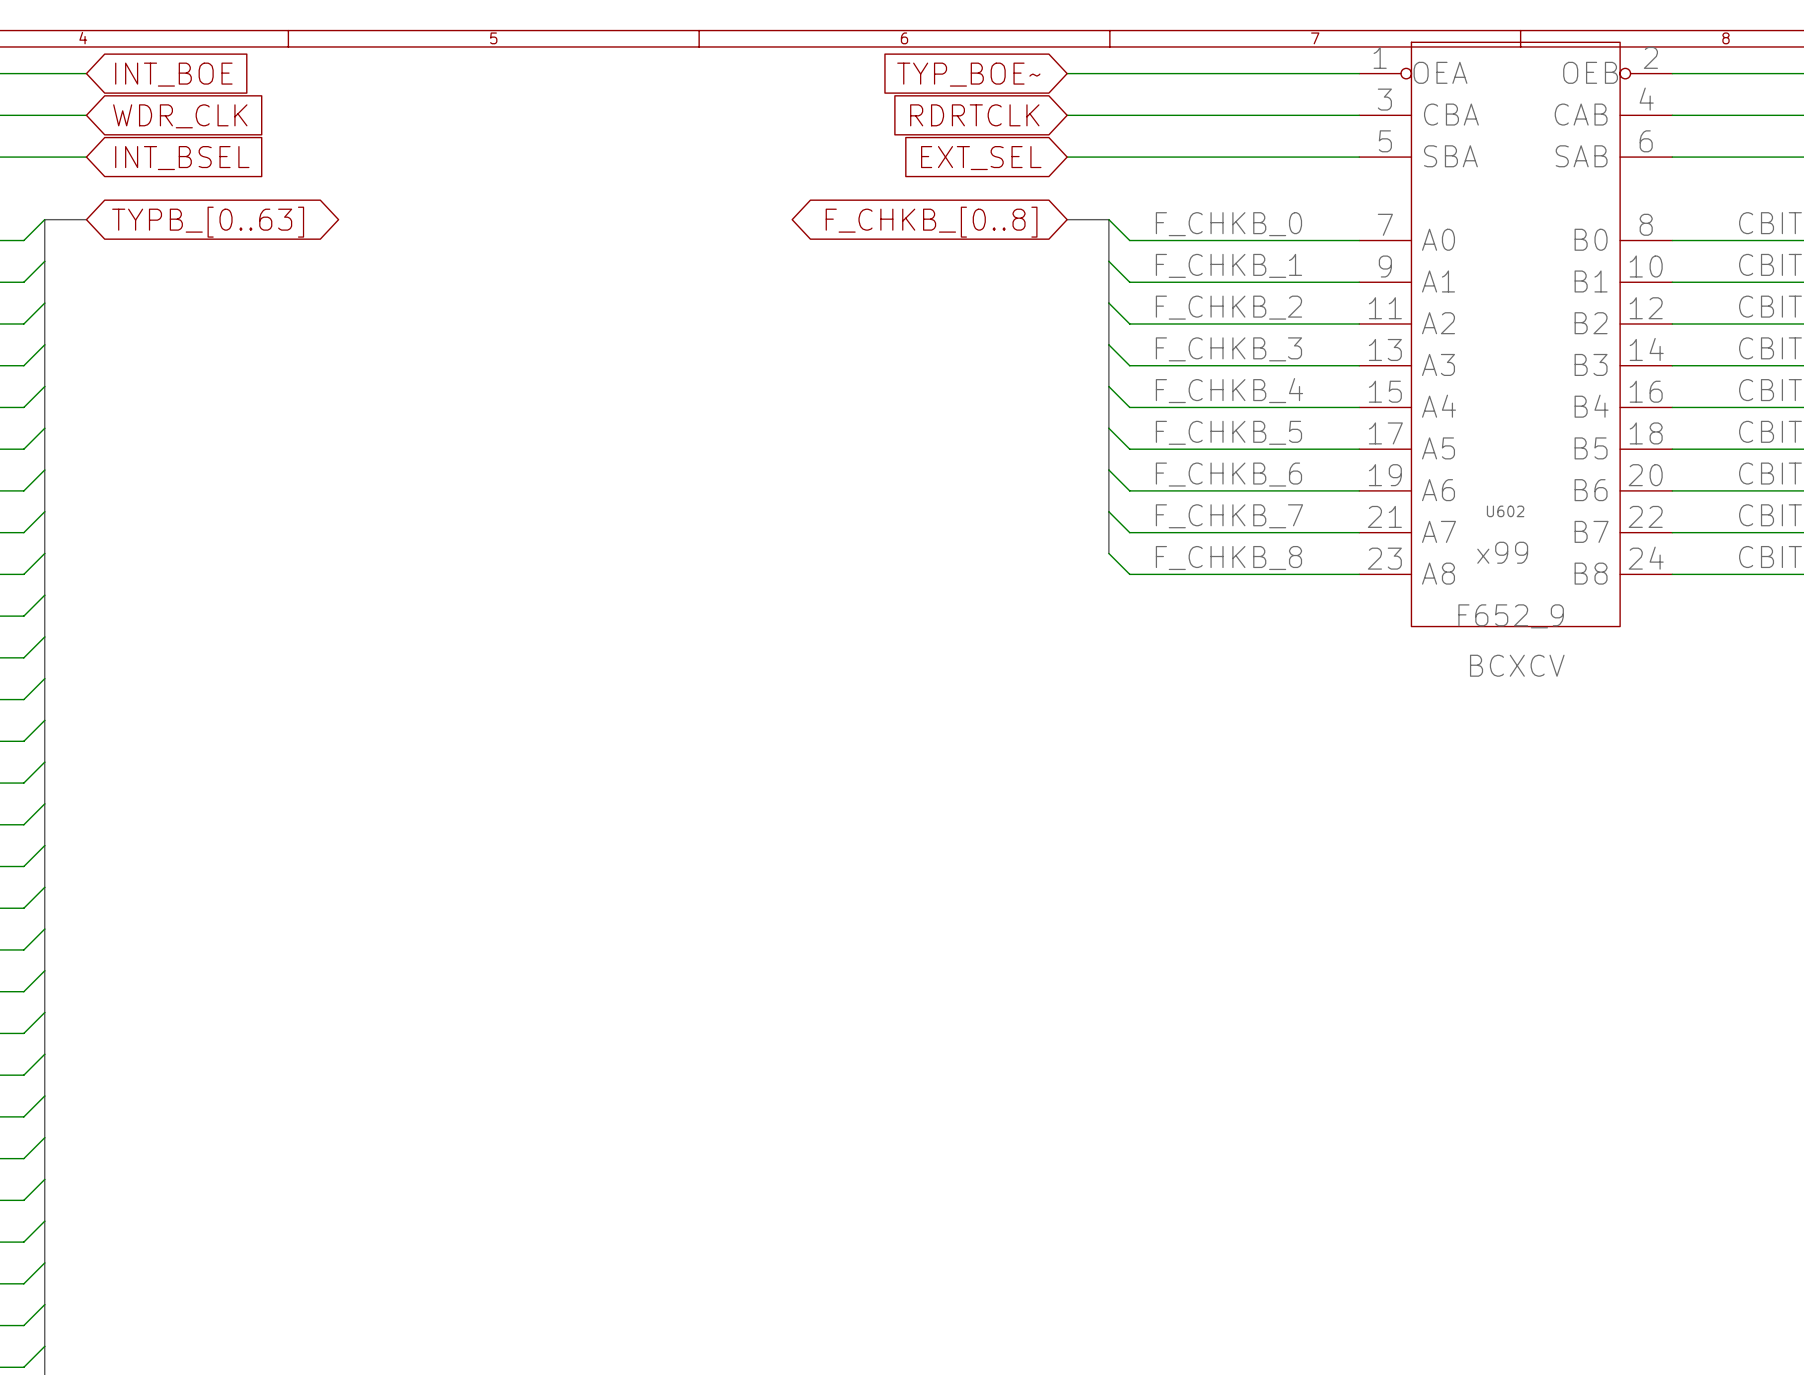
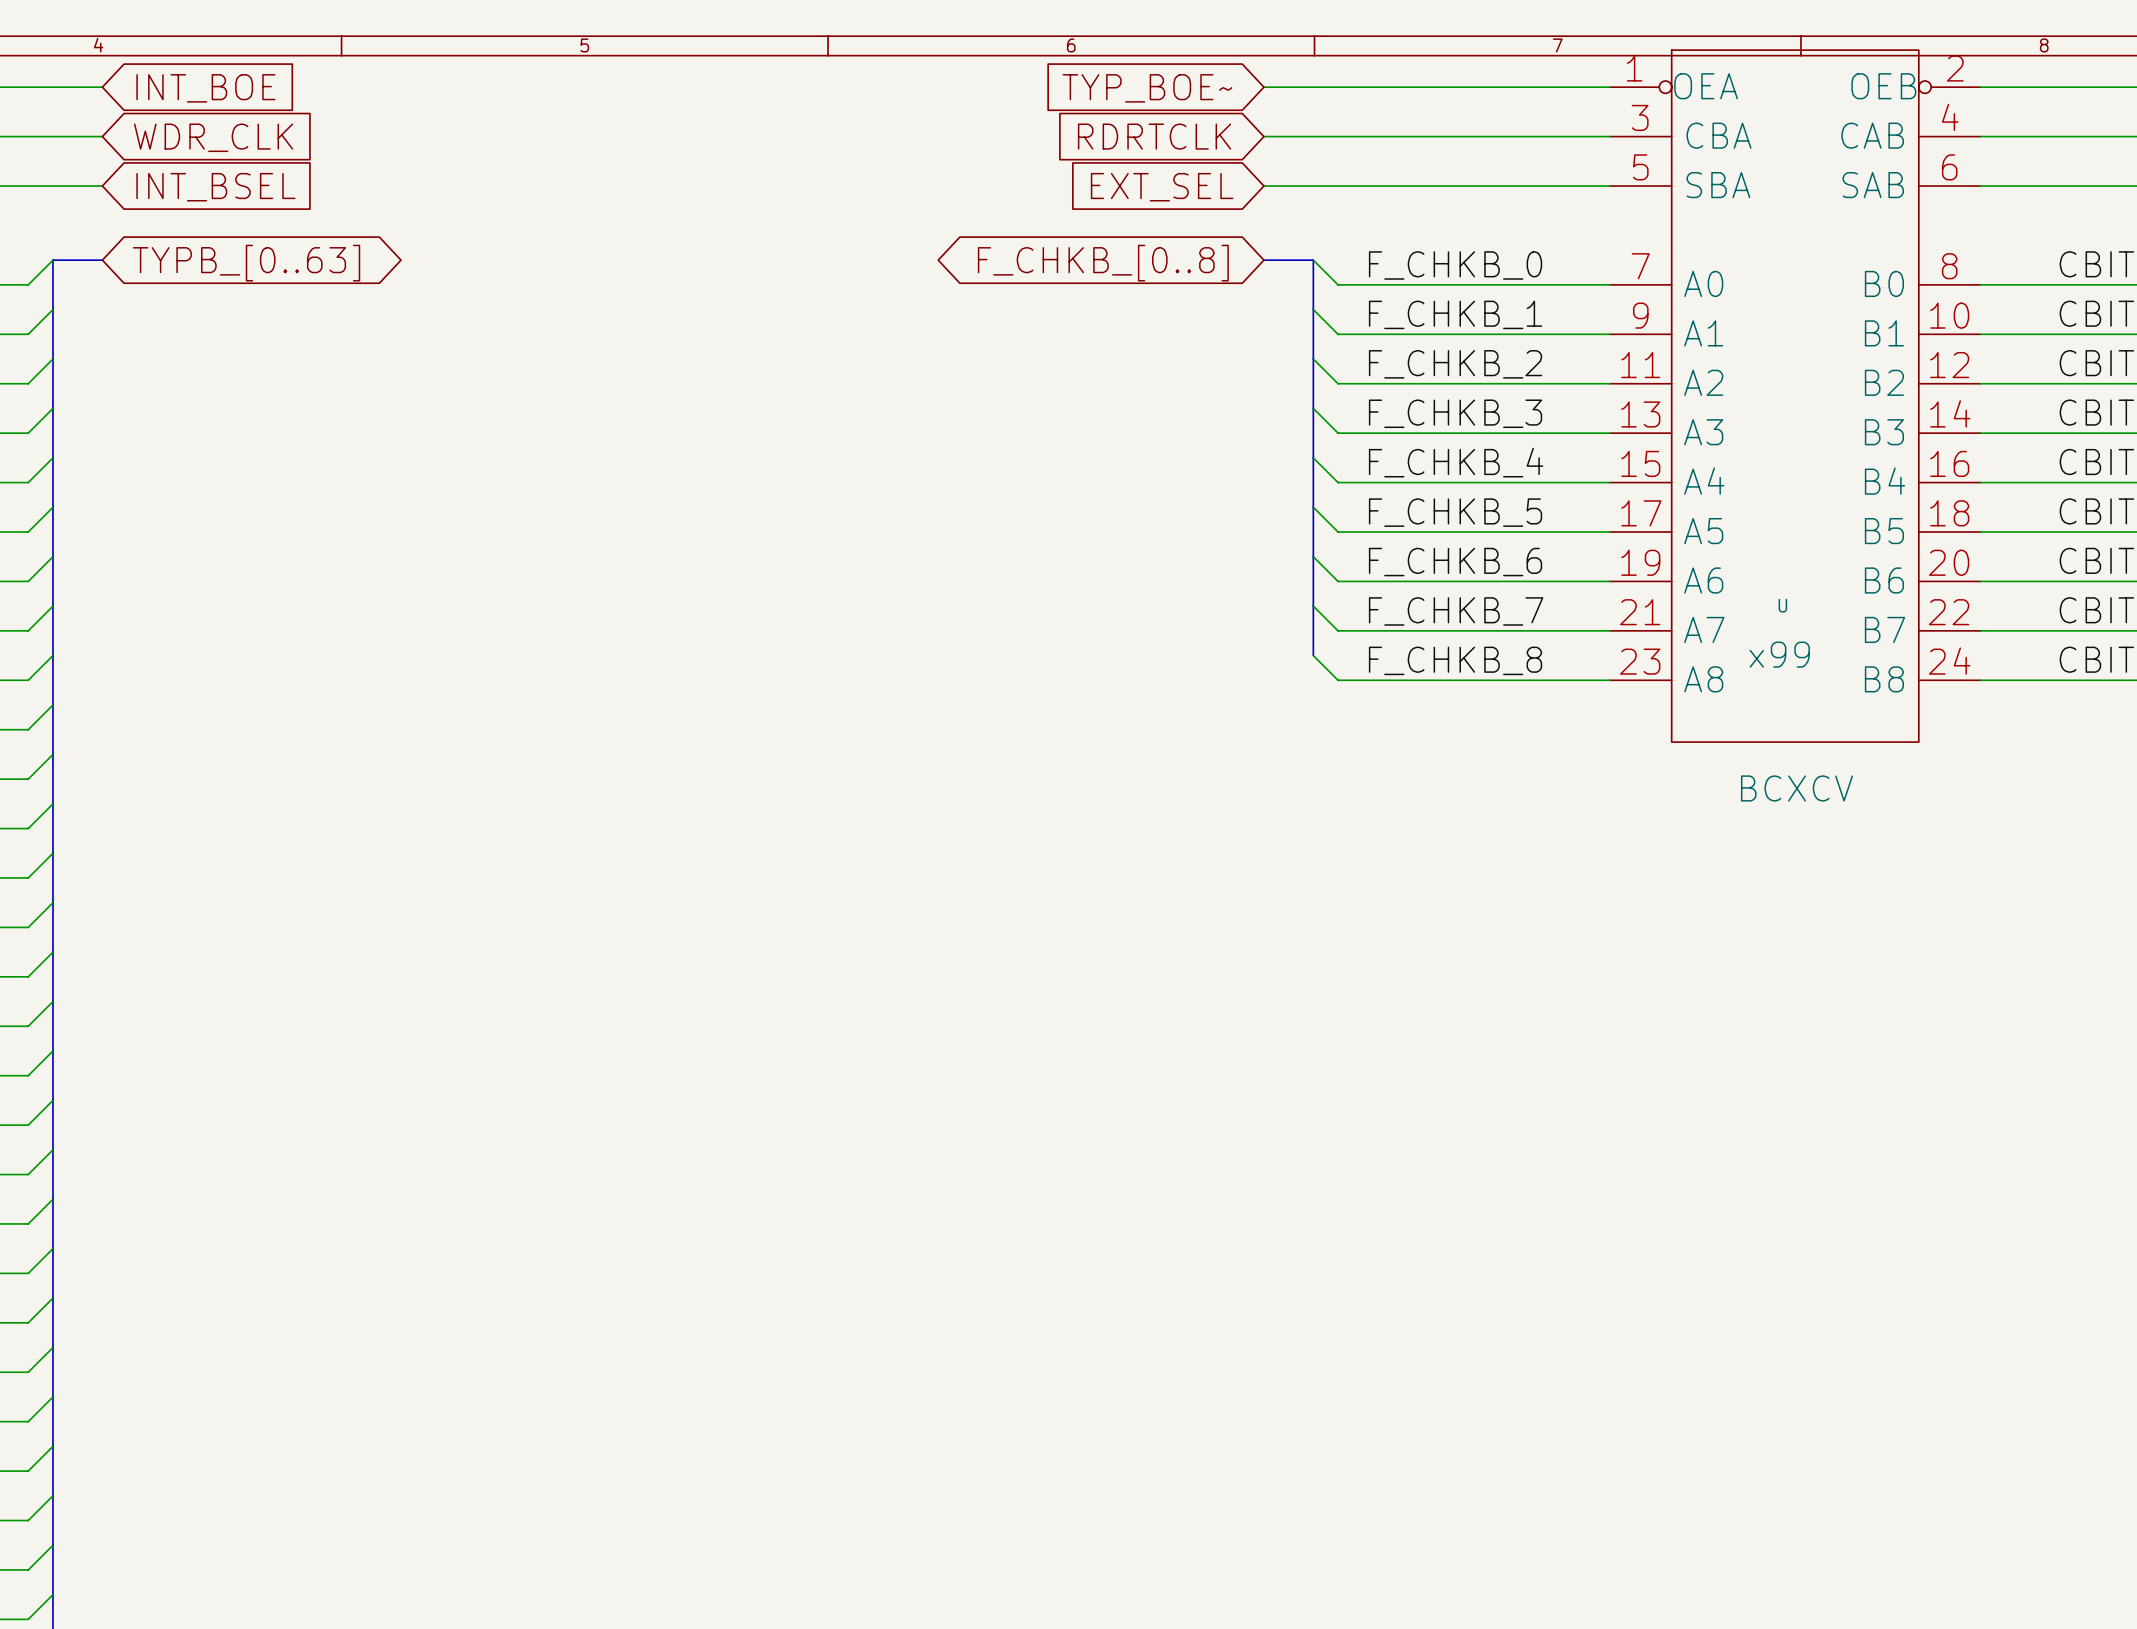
U602 name: U602 (1505, 511) -> U (1782, 605)
U602 value: F652_9 (1511, 616) -> none

